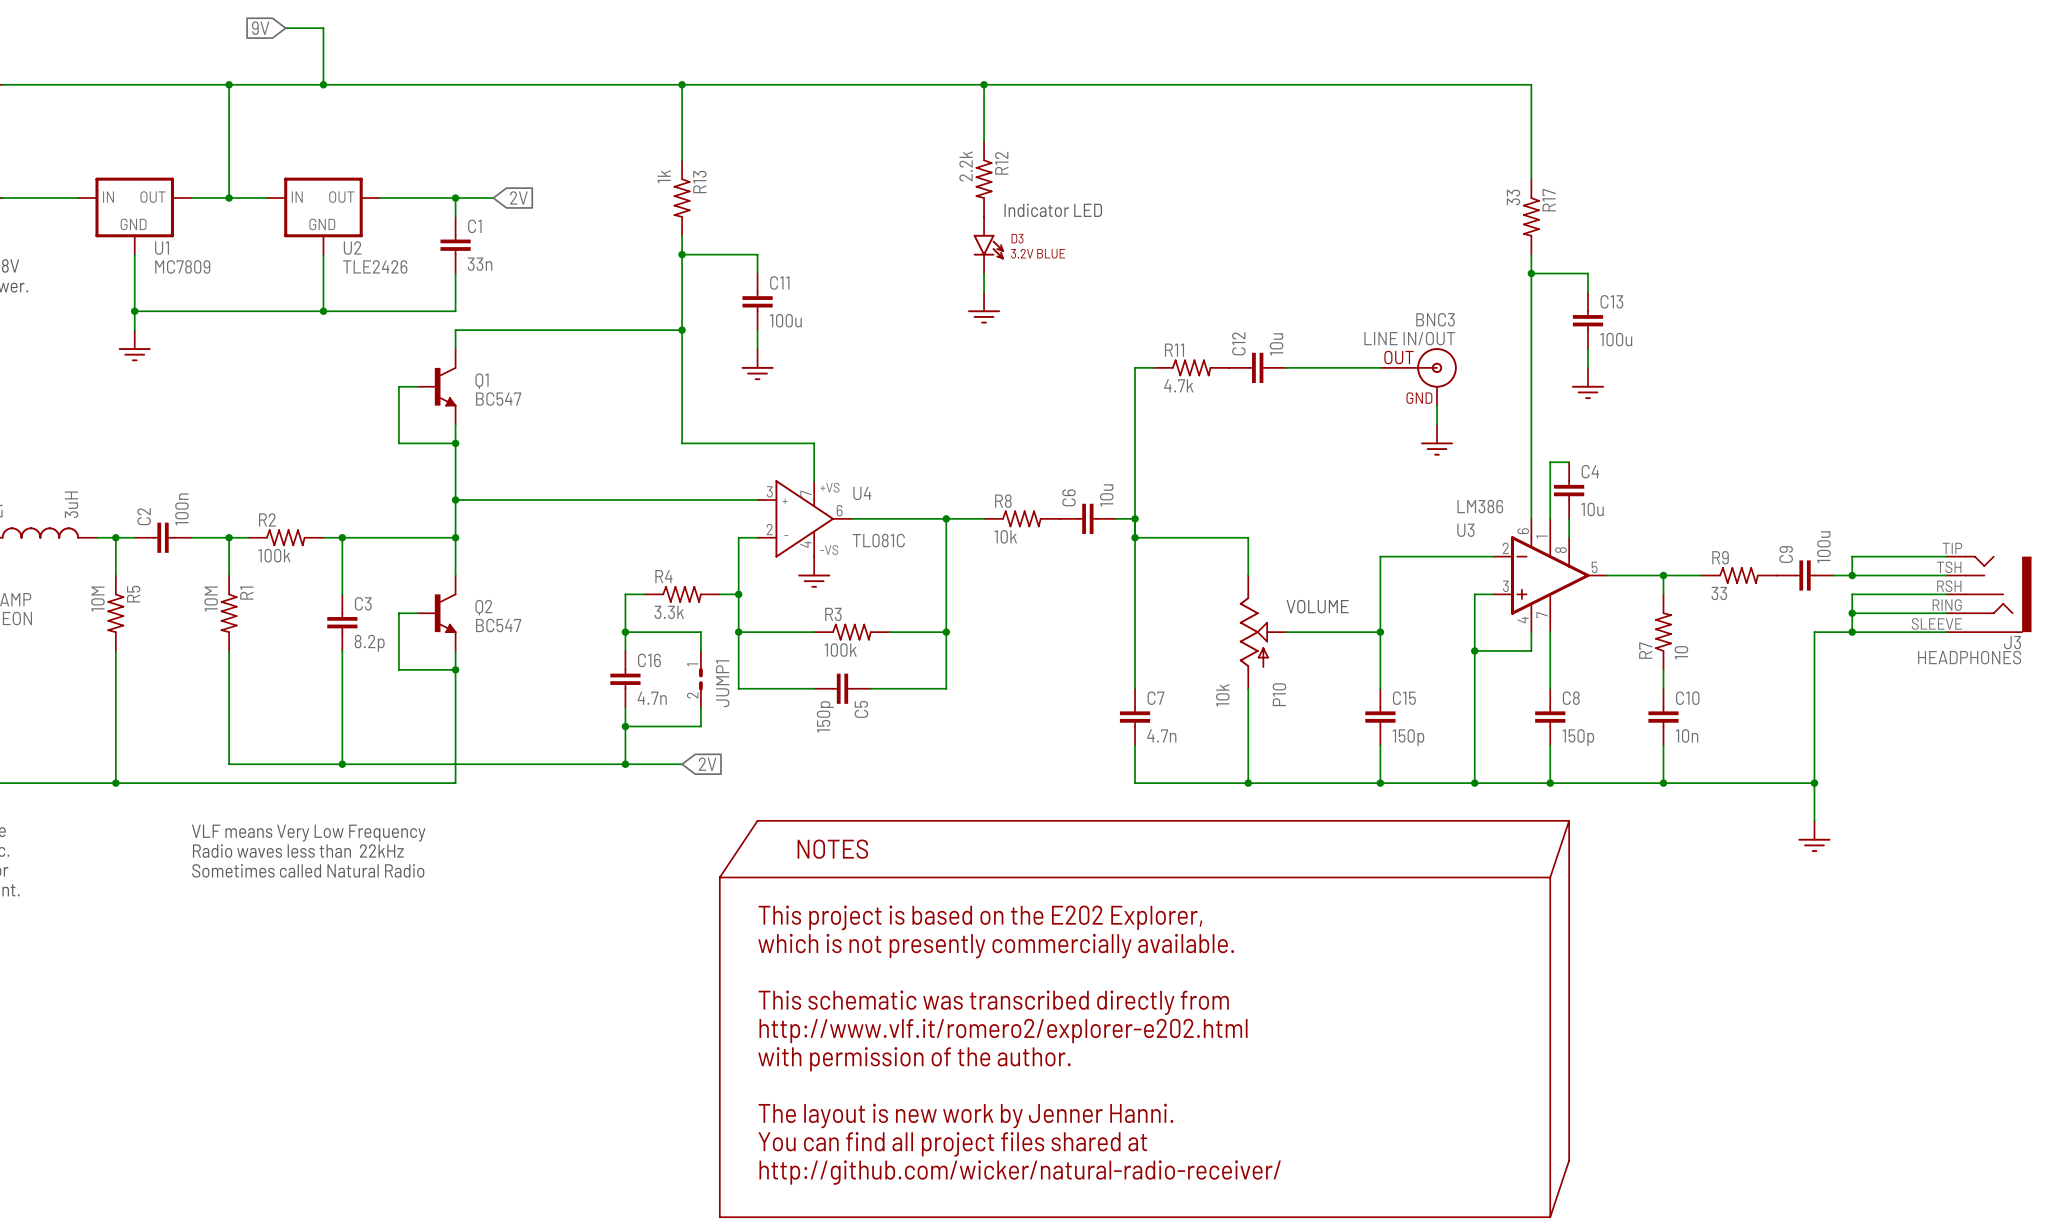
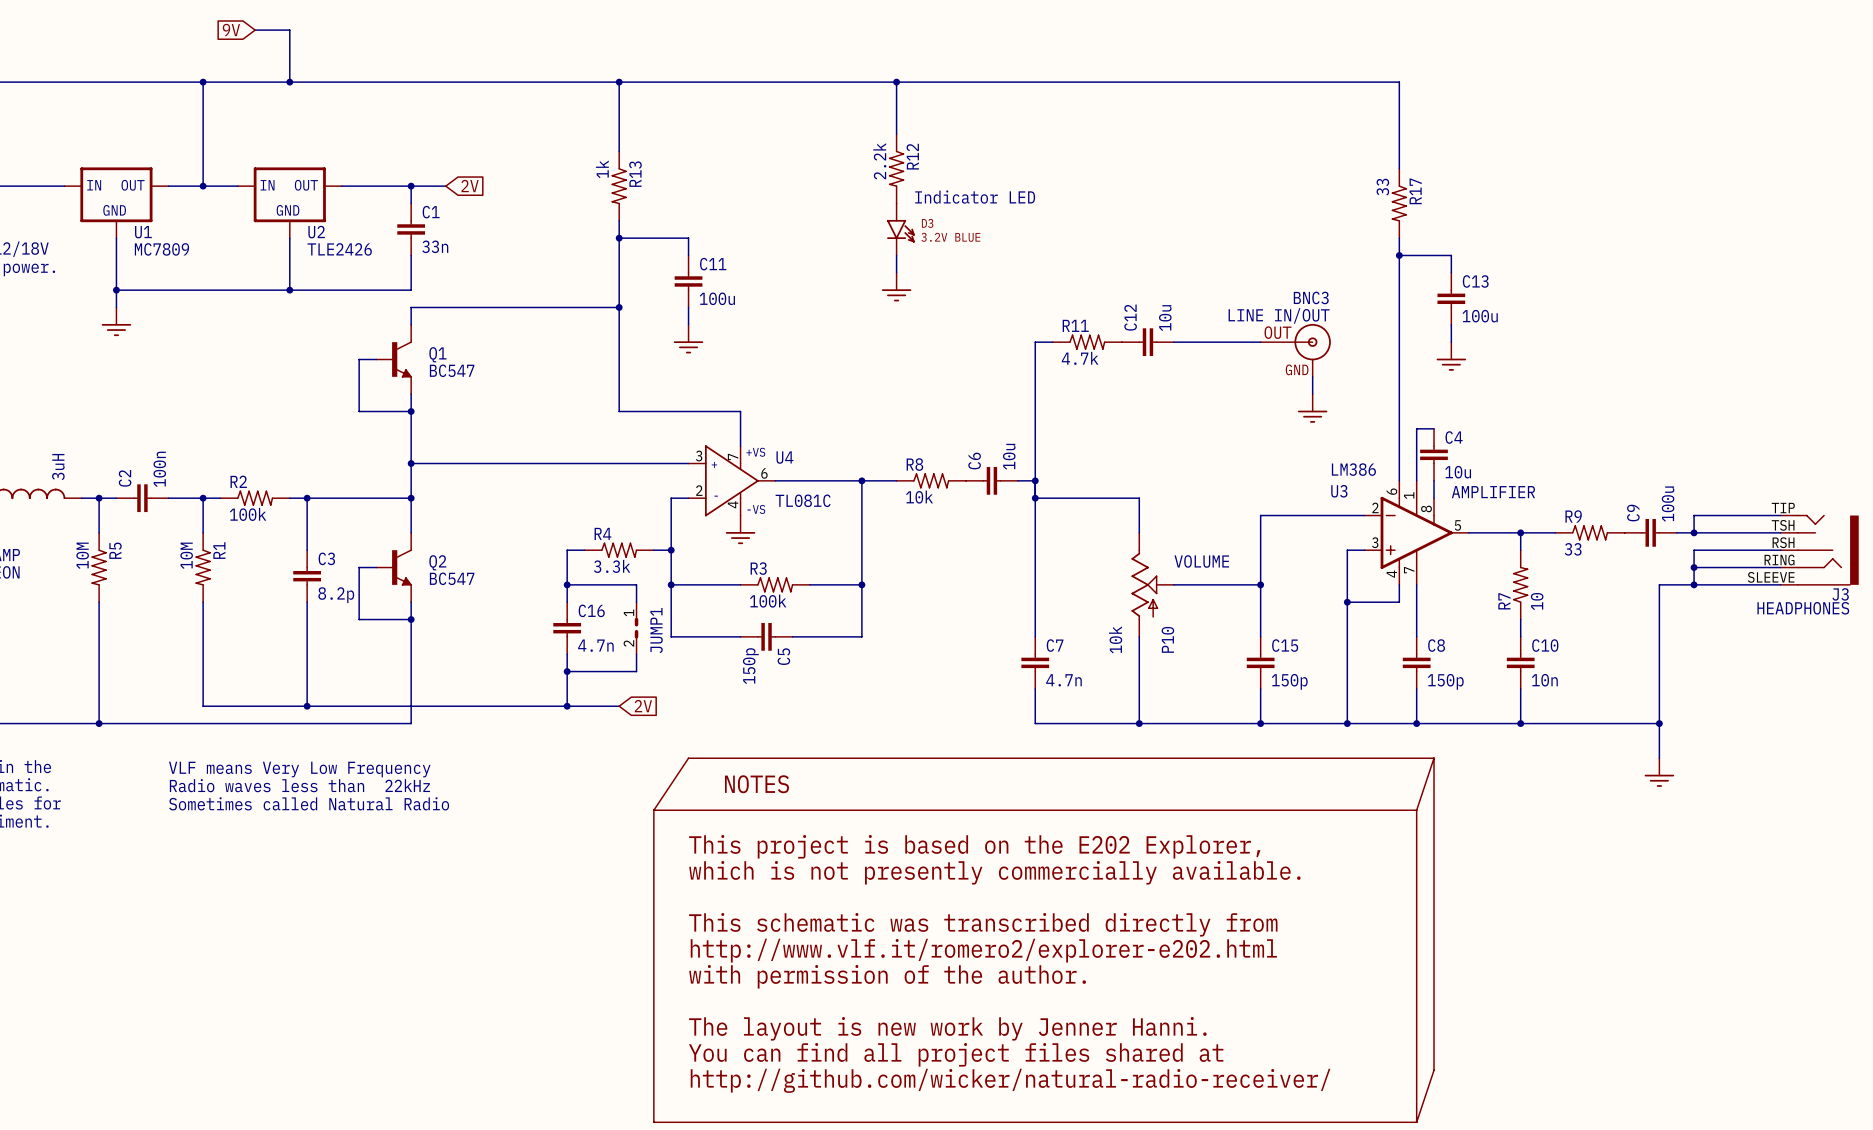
text: none -> AMPLIFIER (1493, 492)

